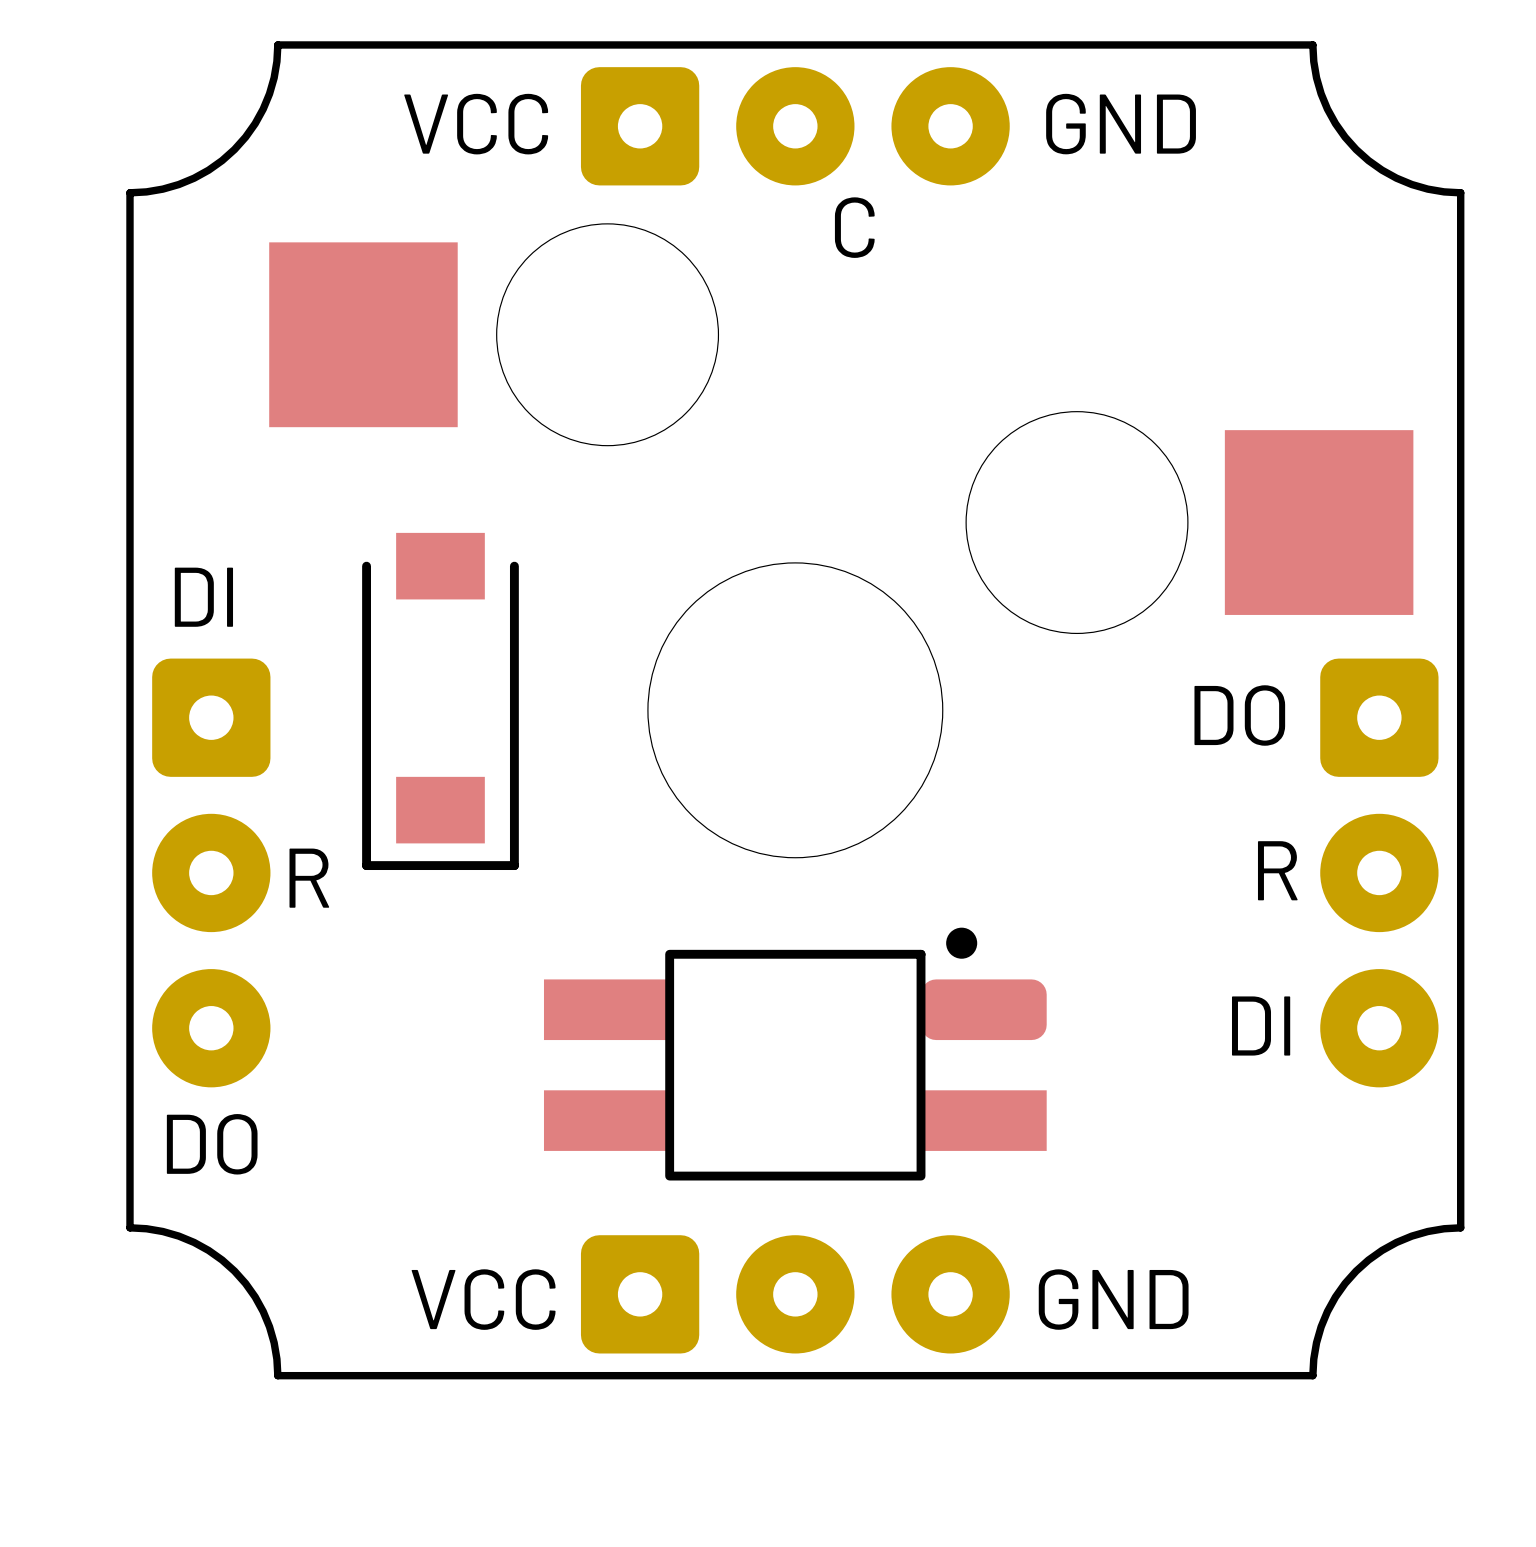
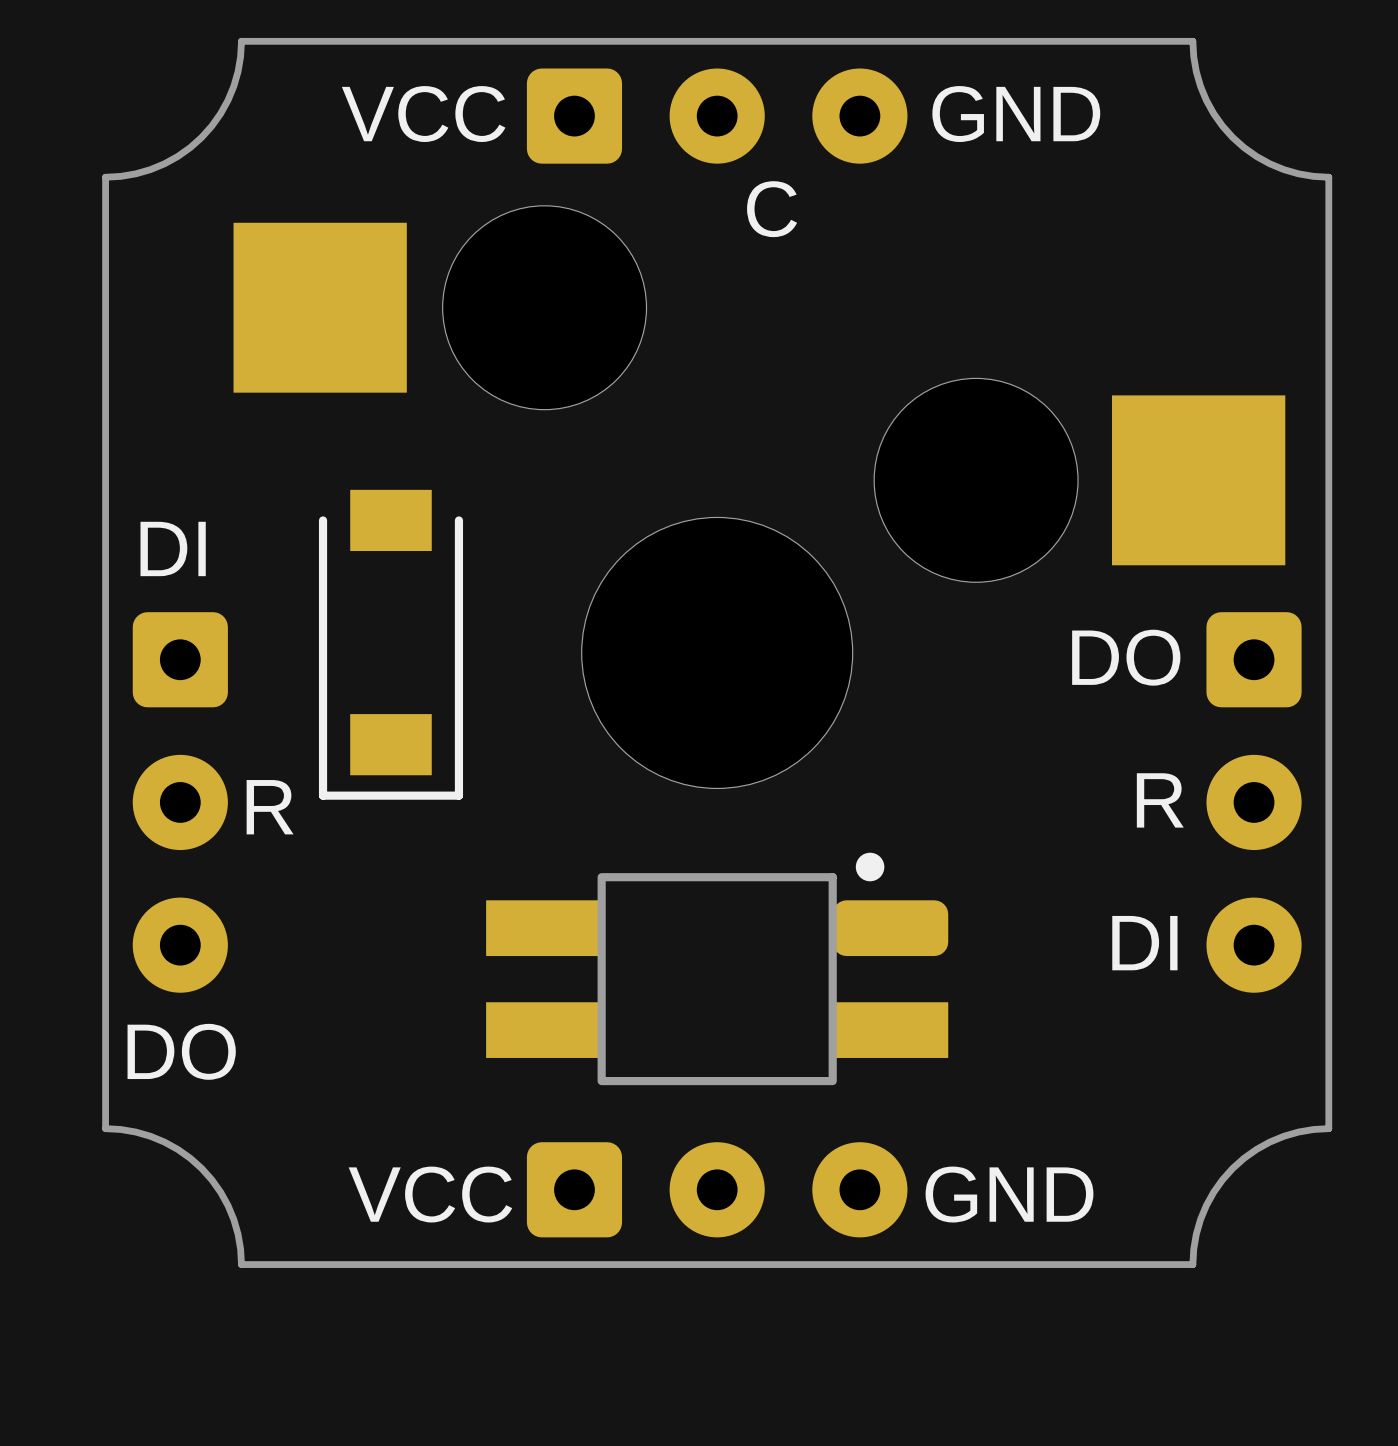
part footprint: [580, 67, 1010, 186] -> [526, 68, 908, 164]
part footprint: [152, 658, 271, 1088] -> [132, 612, 228, 993]
part footprint: [1320, 658, 1439, 1088] -> [1206, 612, 1302, 993]
part footprint: [580, 1235, 1010, 1354] -> [526, 1142, 908, 1238]

